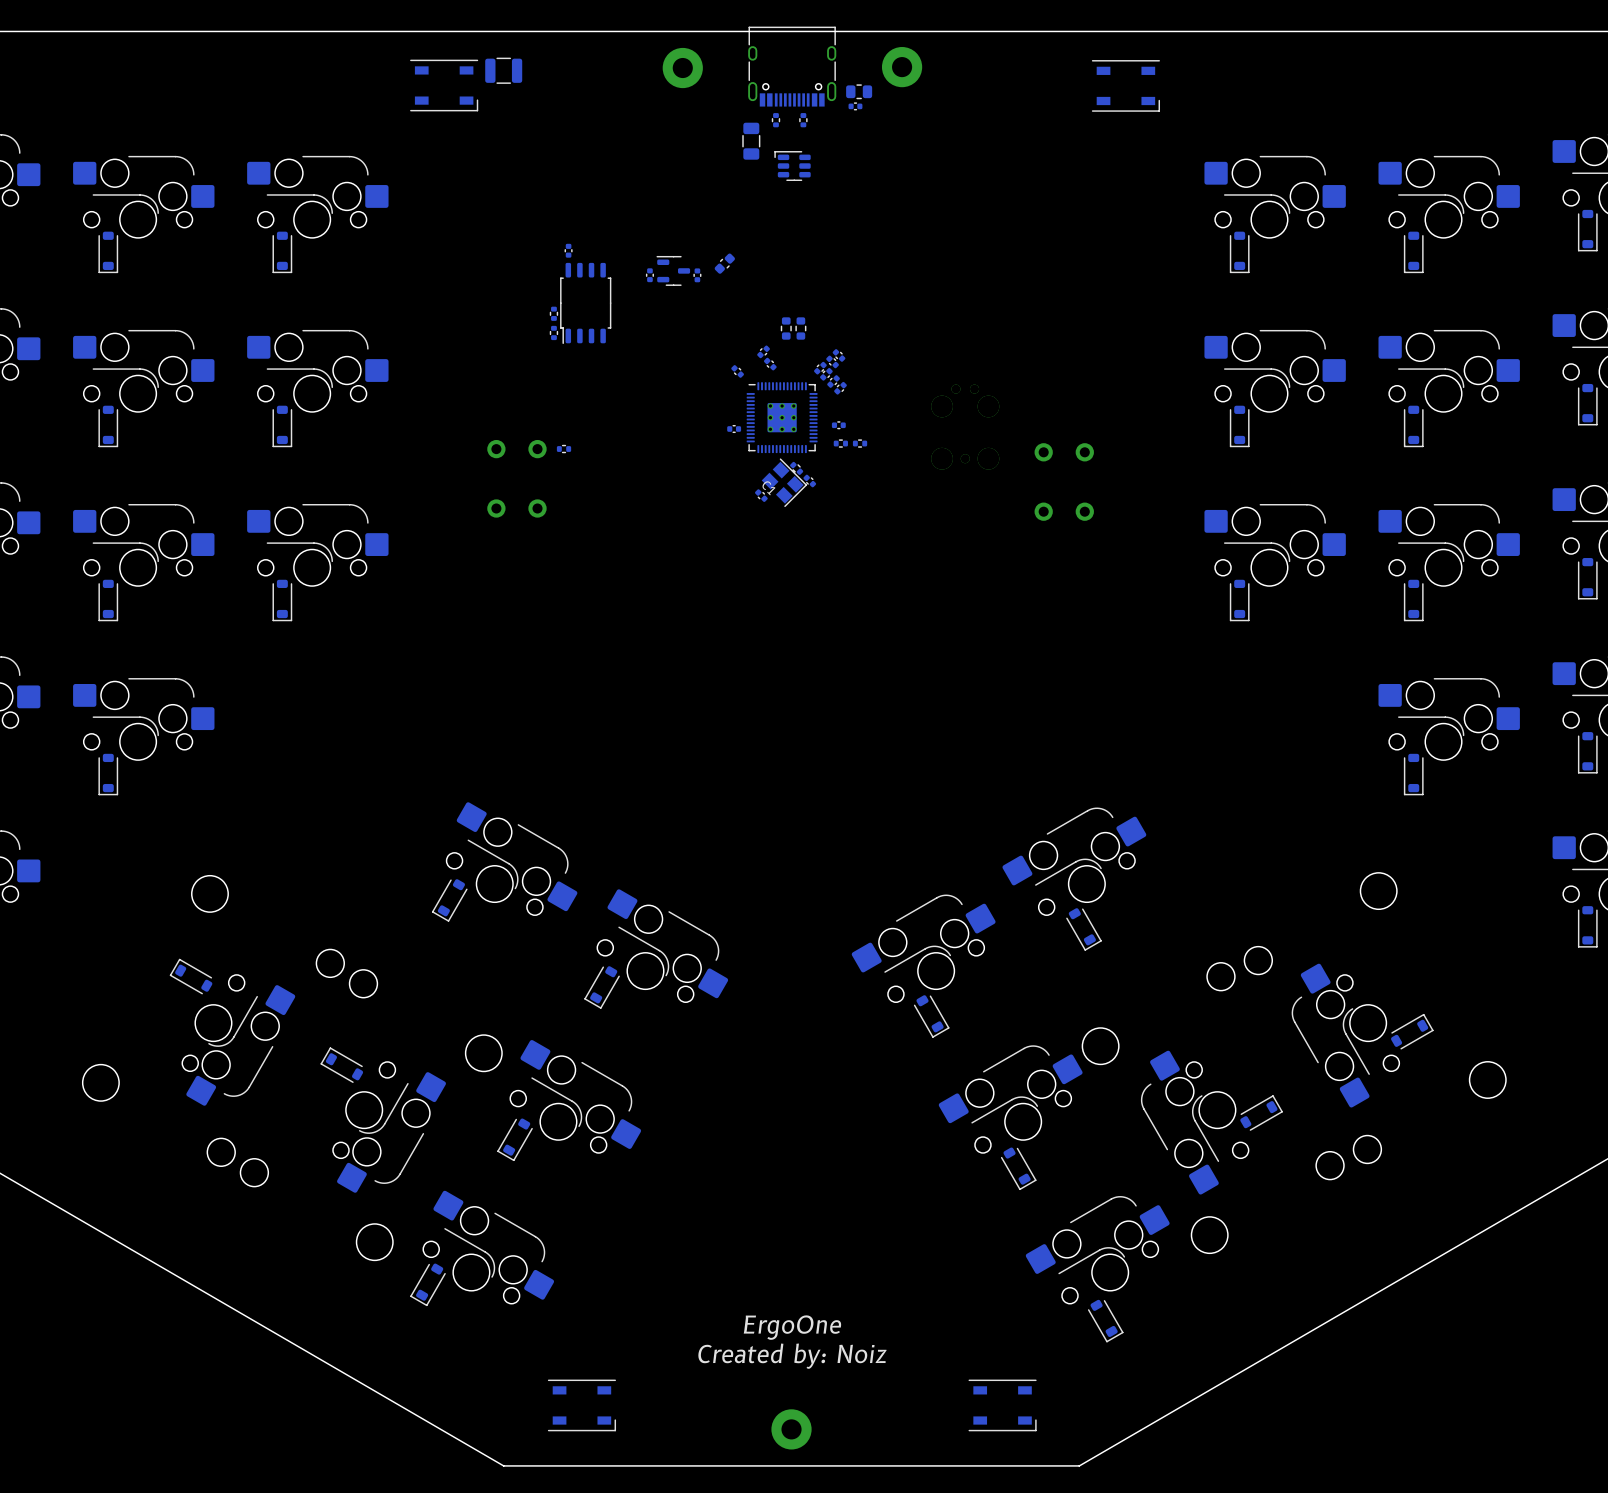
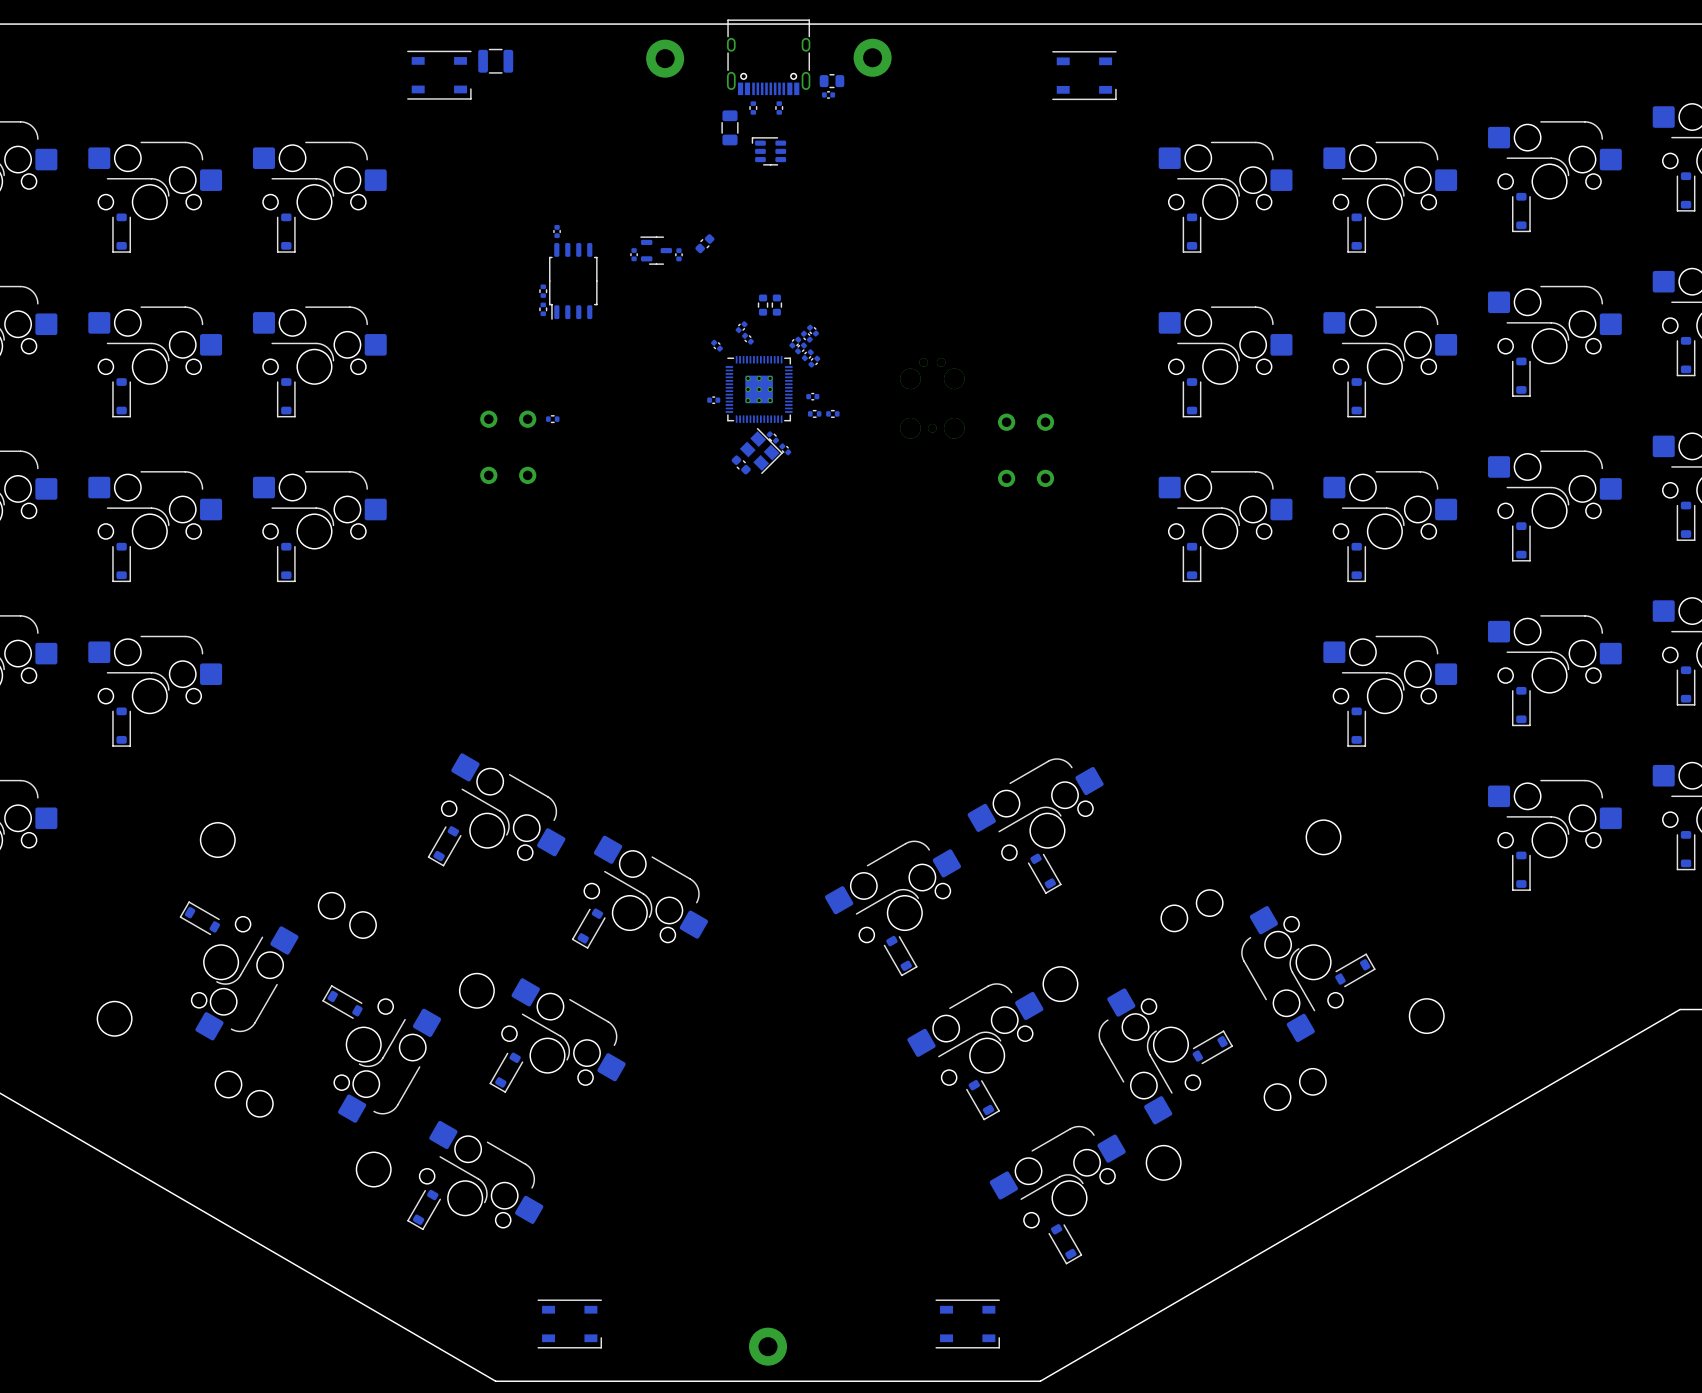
C1: (761, 495) -> none
part: none -> (741, 464)
text: ErgoOne (792, 1327) -> none
text: Created by: Noiz (792, 1356) -> none

